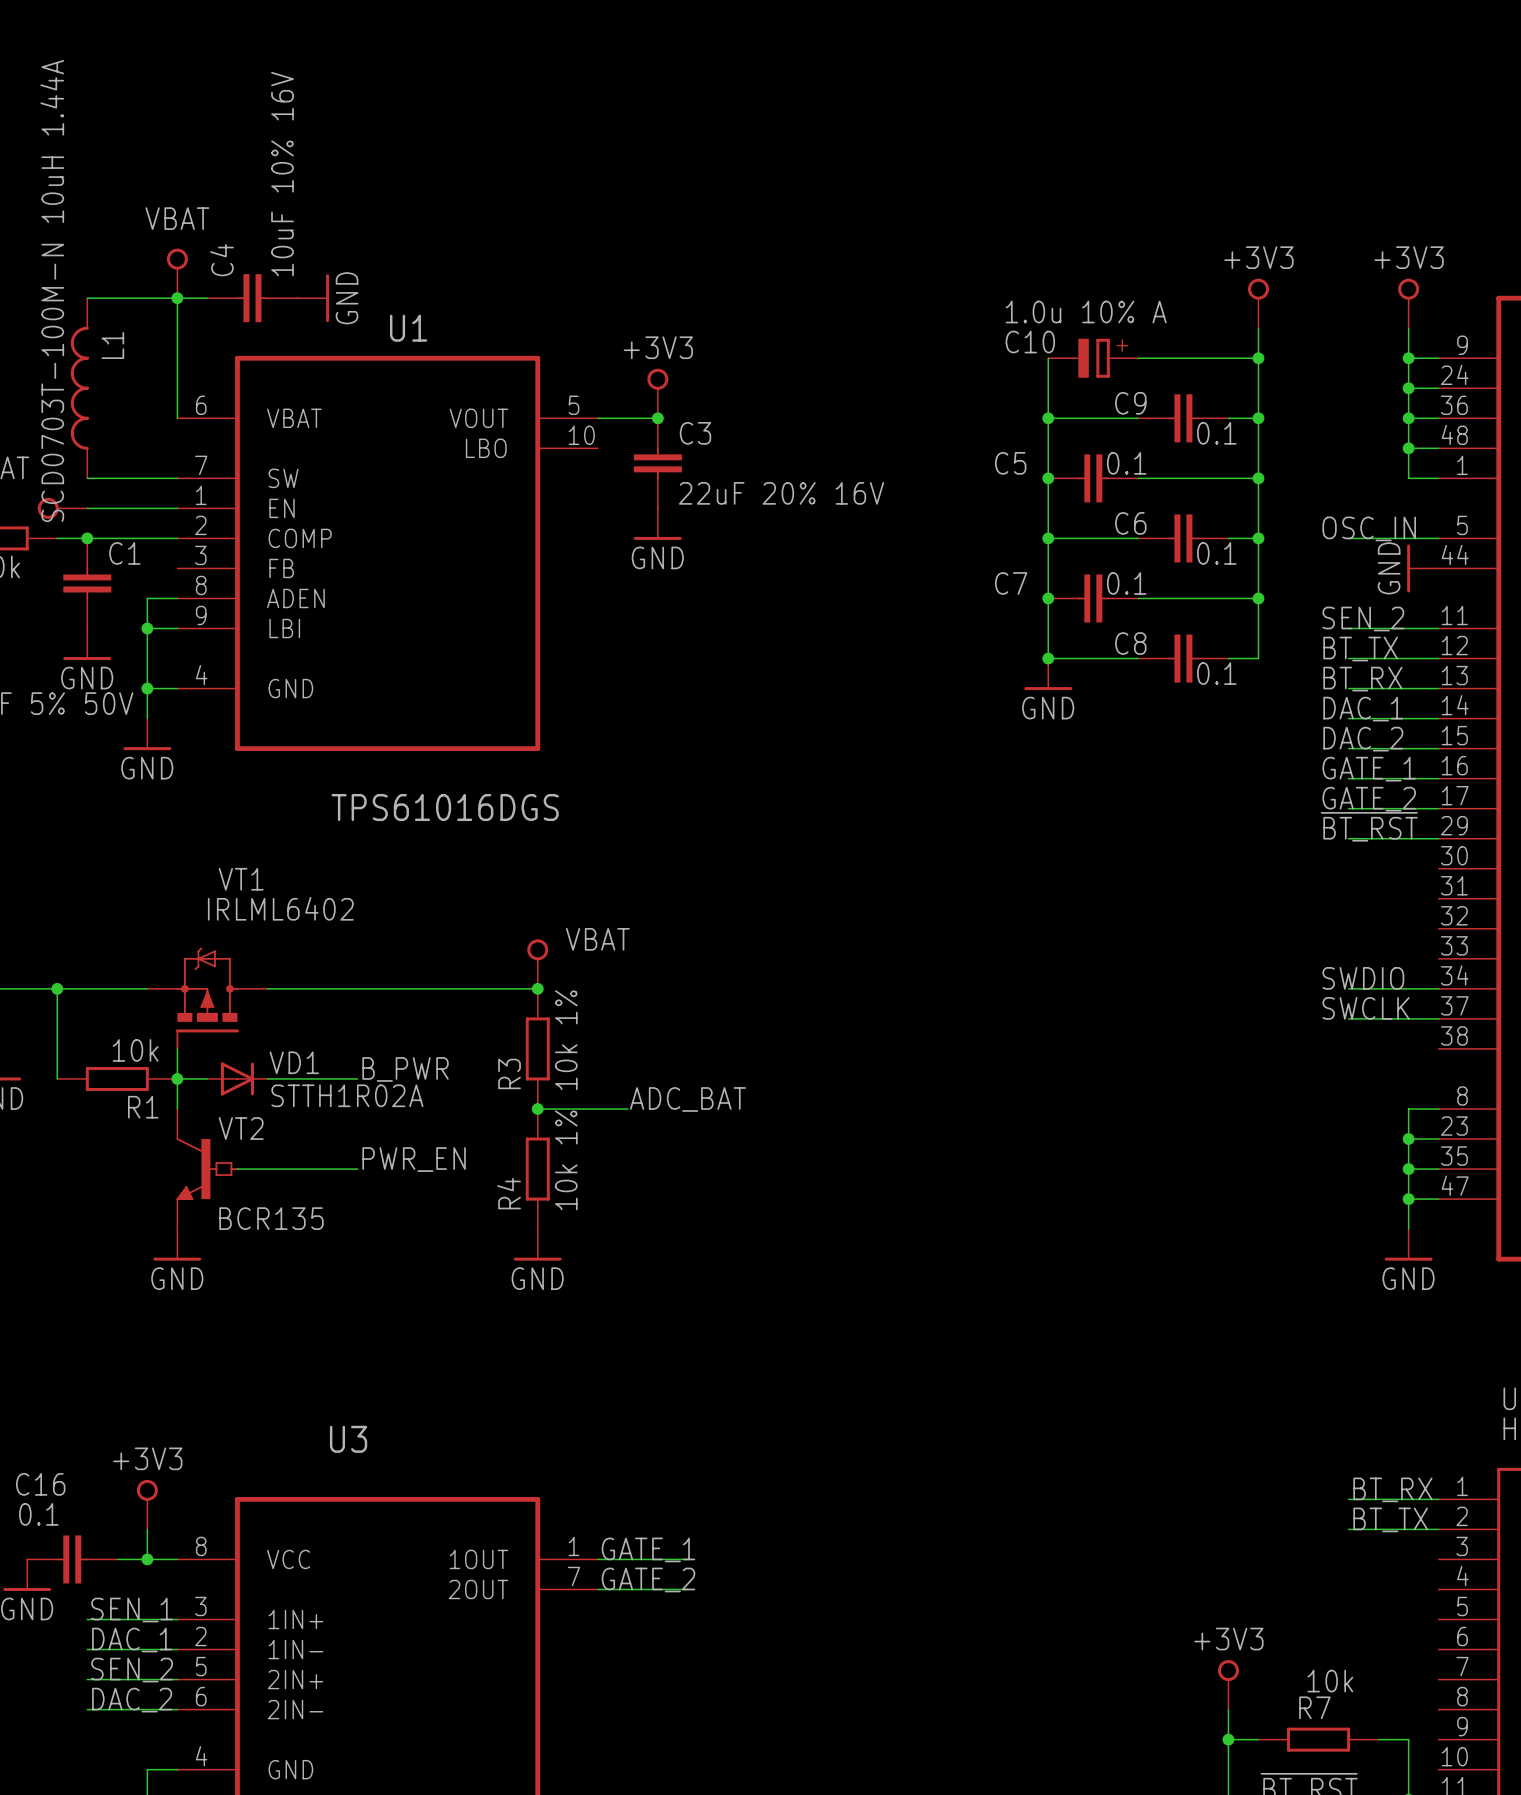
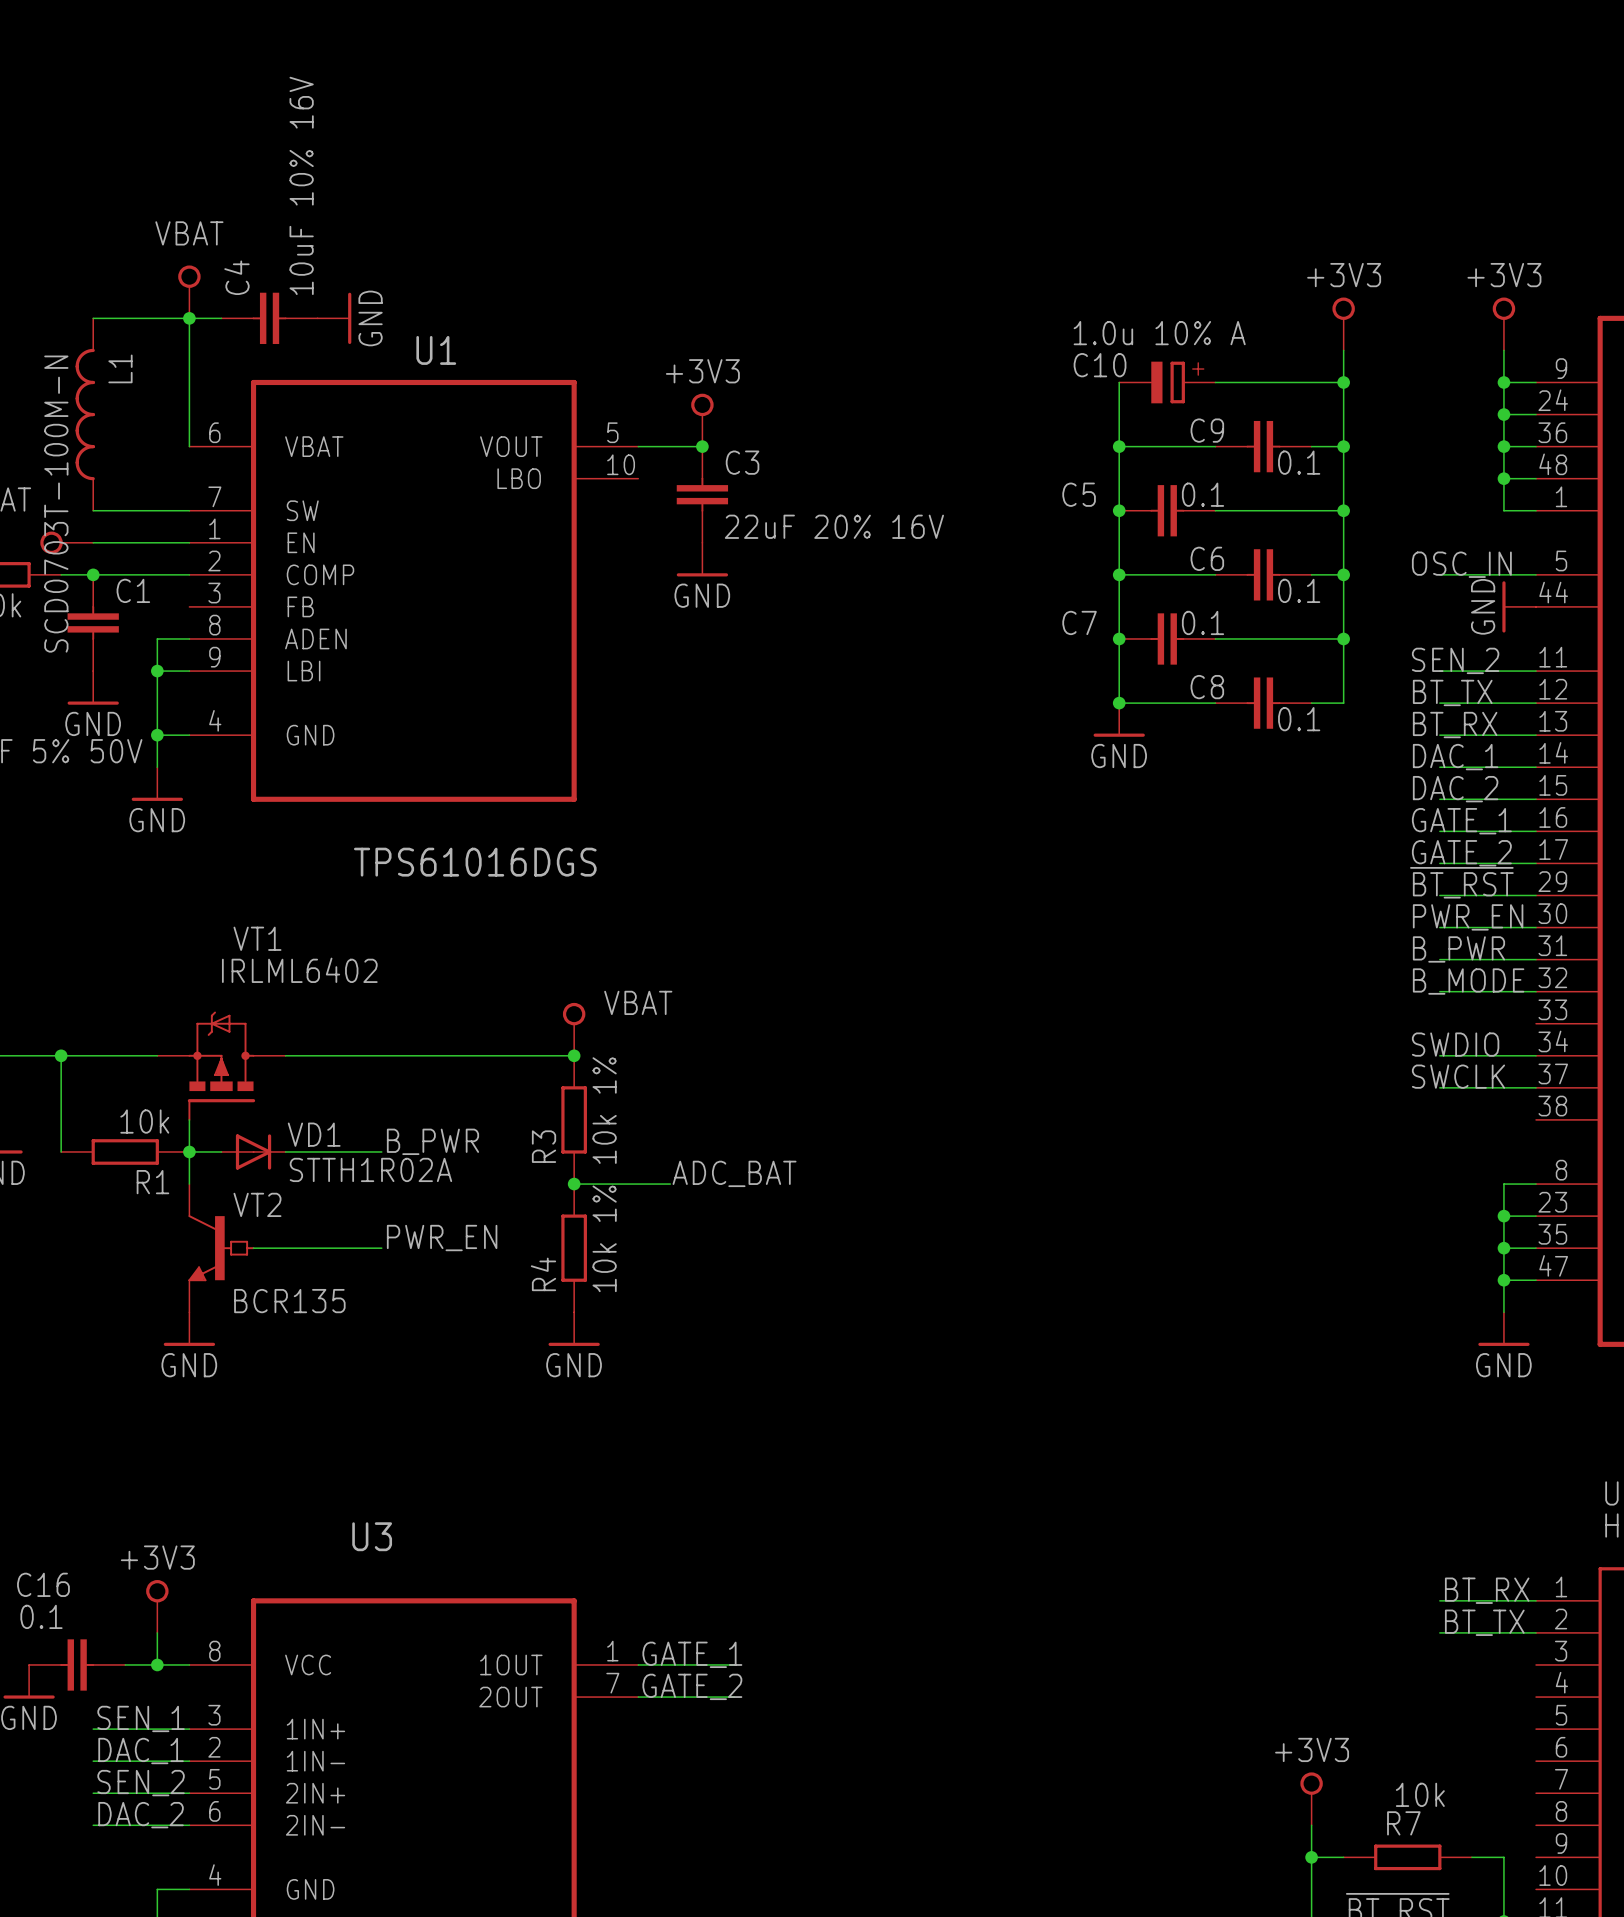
L1 value: SCD0703T-100M-N 10uH 1.44A (52, 291) -> SCD0703T-100M-N (56, 504)
label: none -> PWR_EN (1468, 917)
wire: none -> (1439, 927) (1536, 927)
label: none -> B_PWR (1458, 949)
wire: none -> (1439, 959) (1536, 959)
label: none -> B_MODE (1468, 981)
wire: none -> (1439, 991) (1536, 991)

